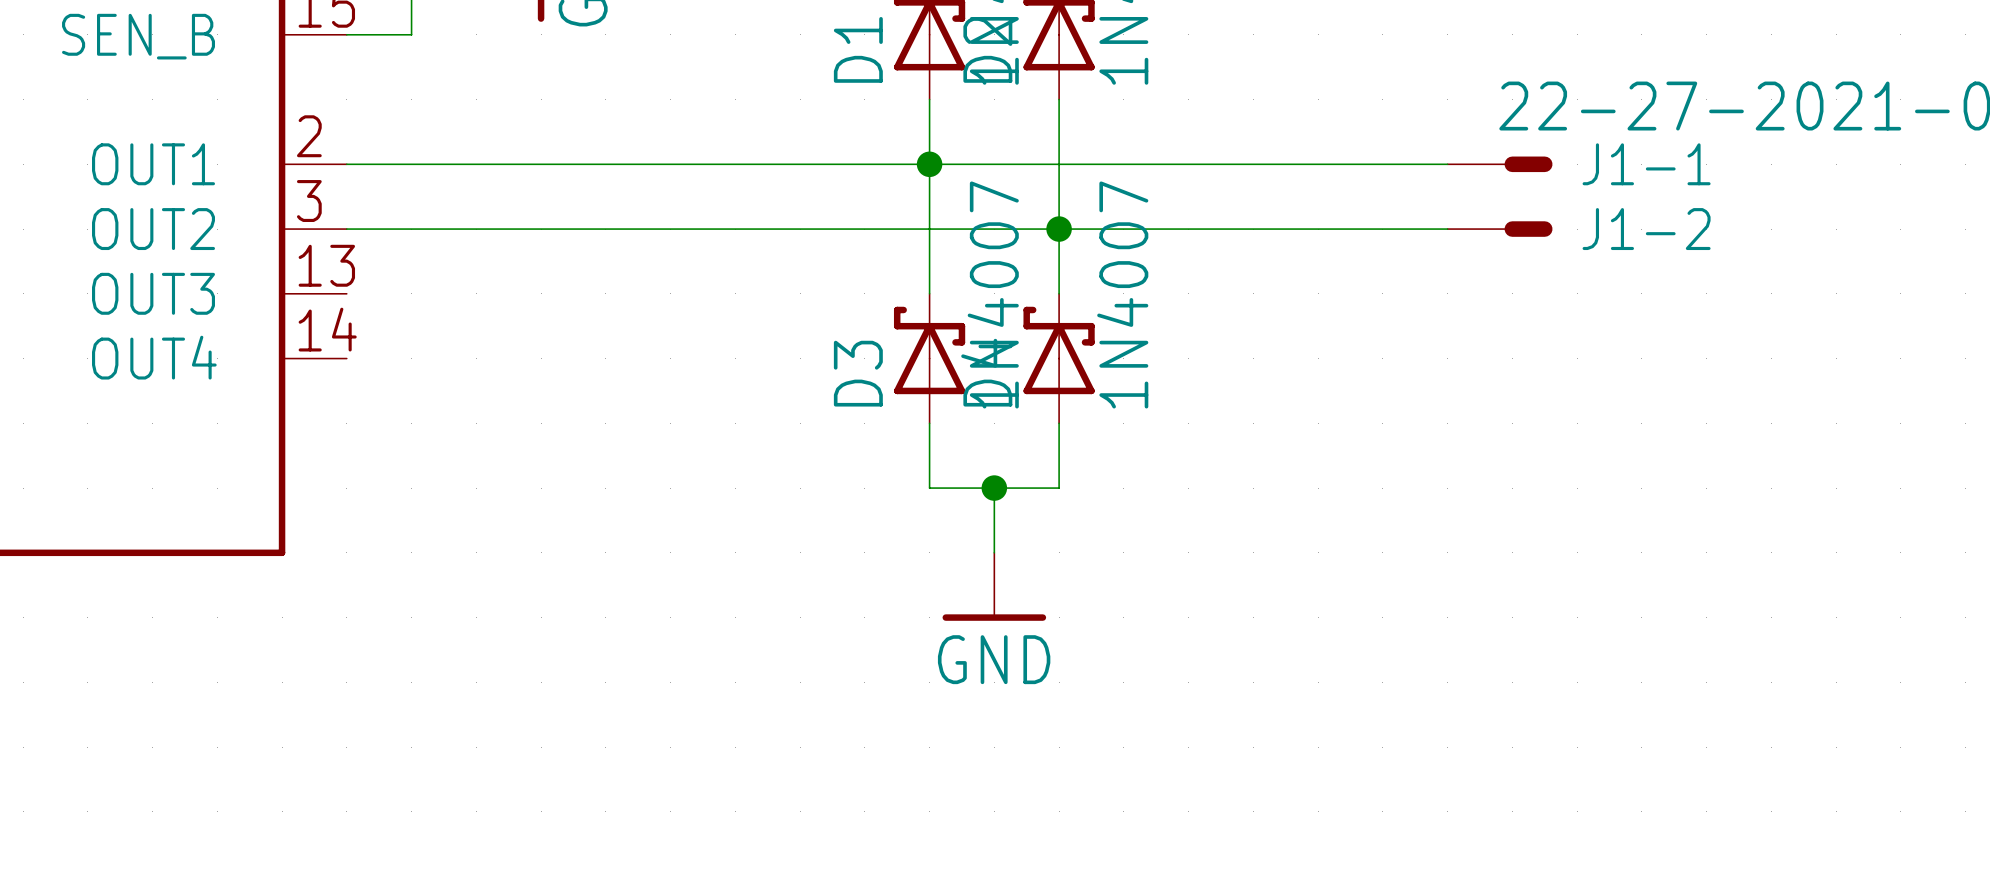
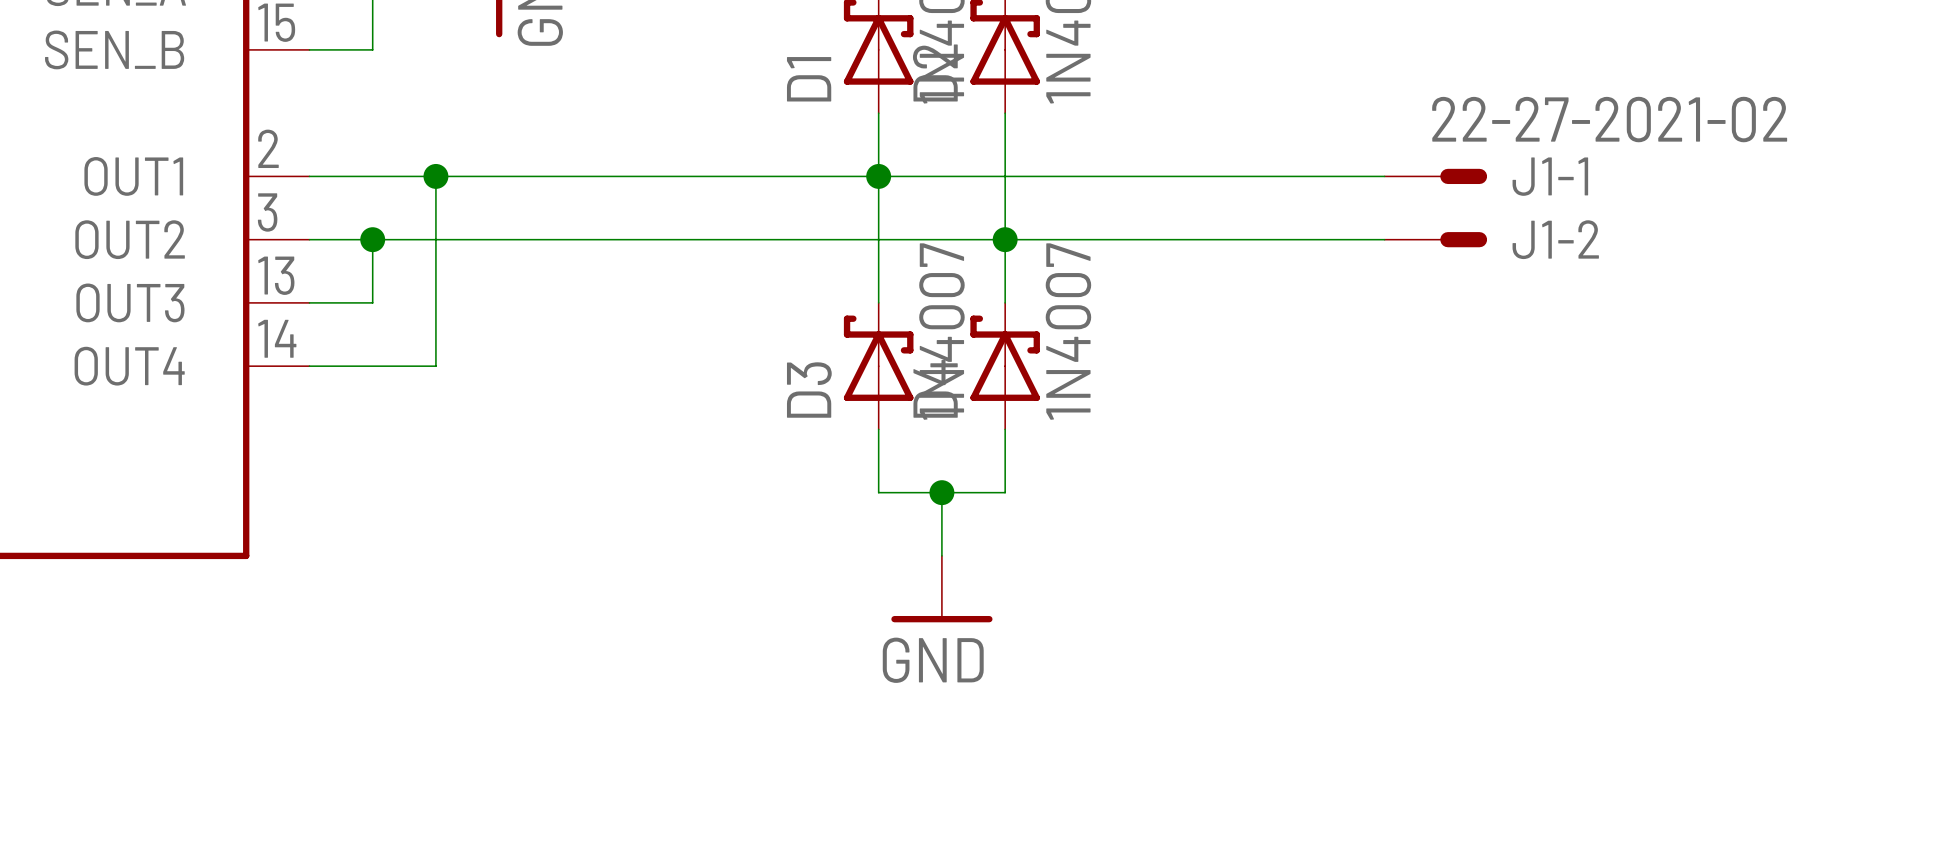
wire: none -> (435, 176) (435, 366) (309, 366)
junction: none -> (435, 176)
wire: none -> (372, 239) (372, 302) (309, 302)
junction: none -> (372, 239)

